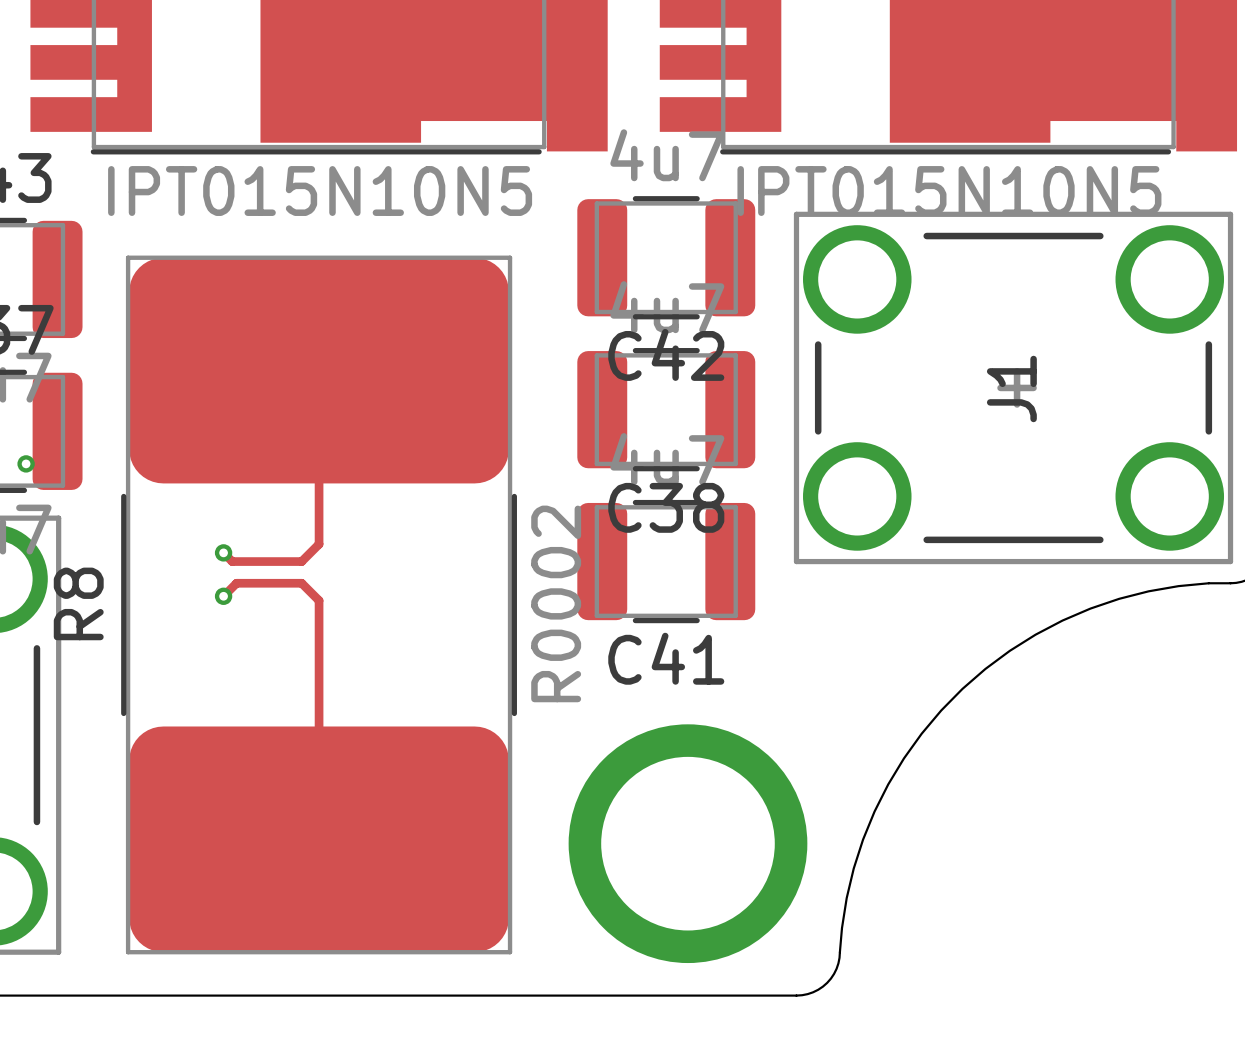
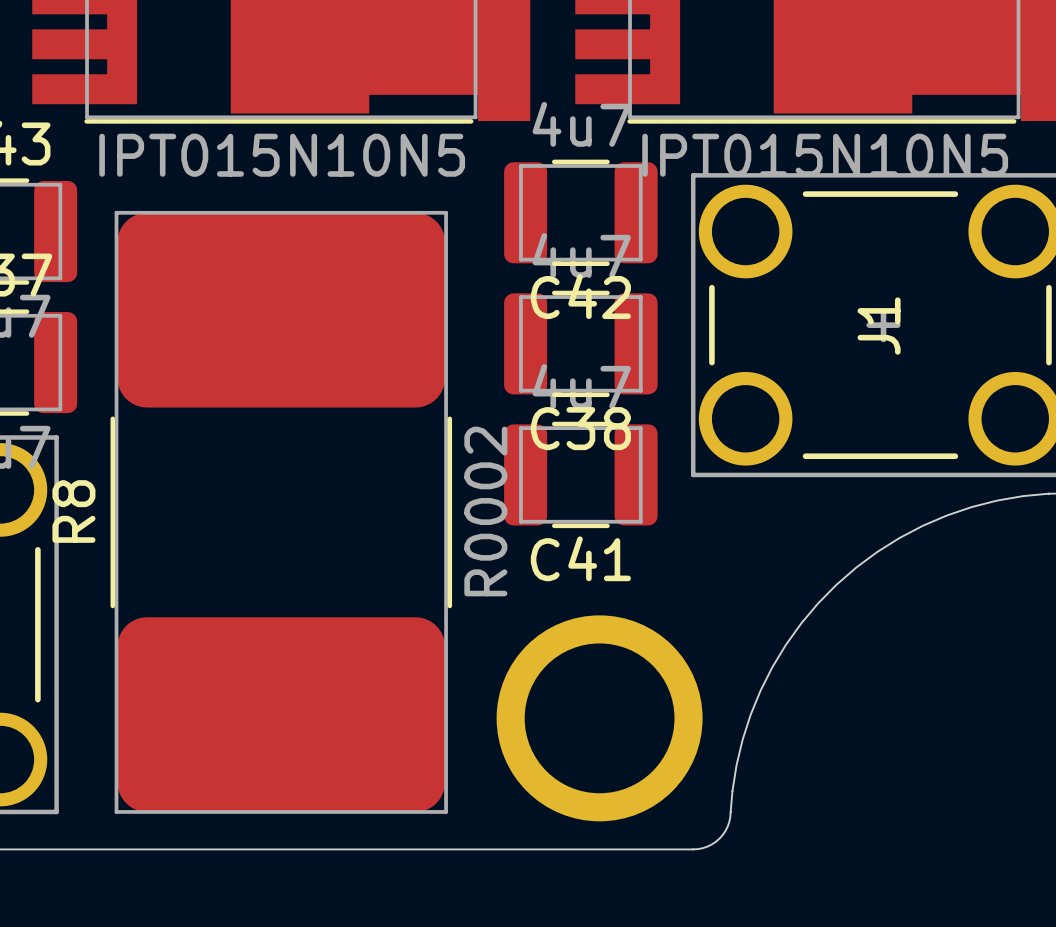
track: (319, 370) (319, 544) (301, 561) (232, 561) (223, 552) -> none
via: (26, 463) -> none
via: (223, 552) -> none
track: (223, 596) (236, 583) (301, 583) (319, 600) (319, 839) -> none
via: (223, 596) -> none

